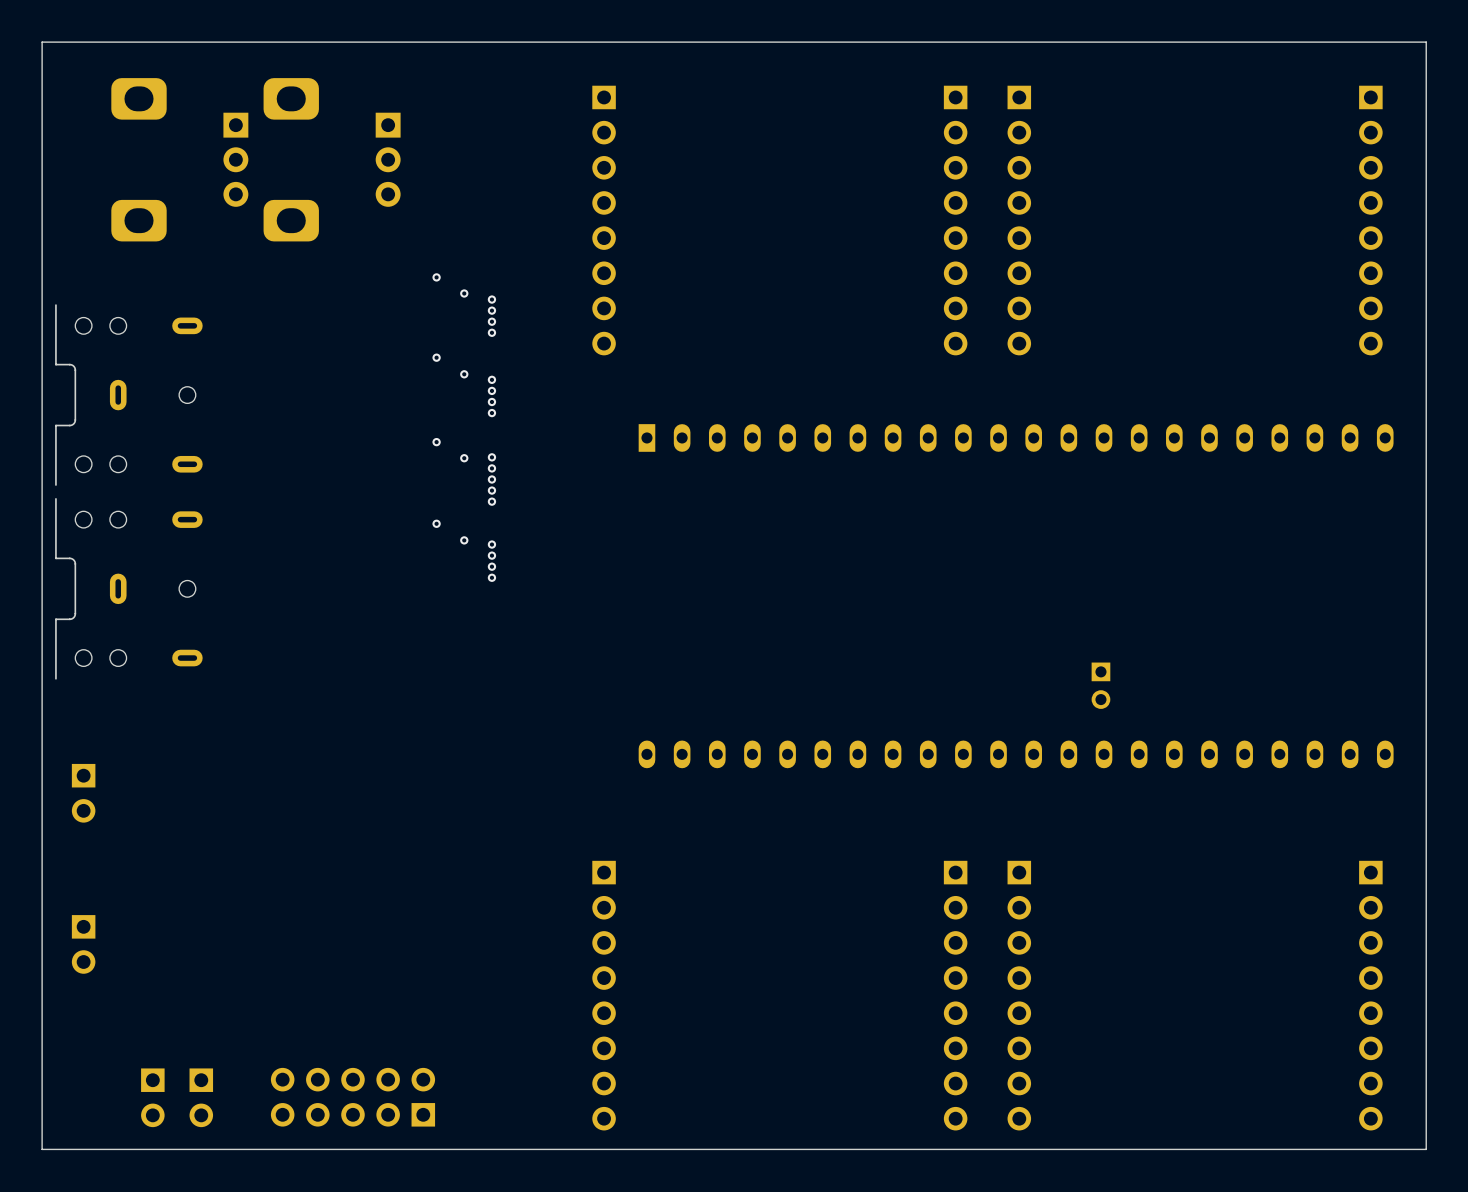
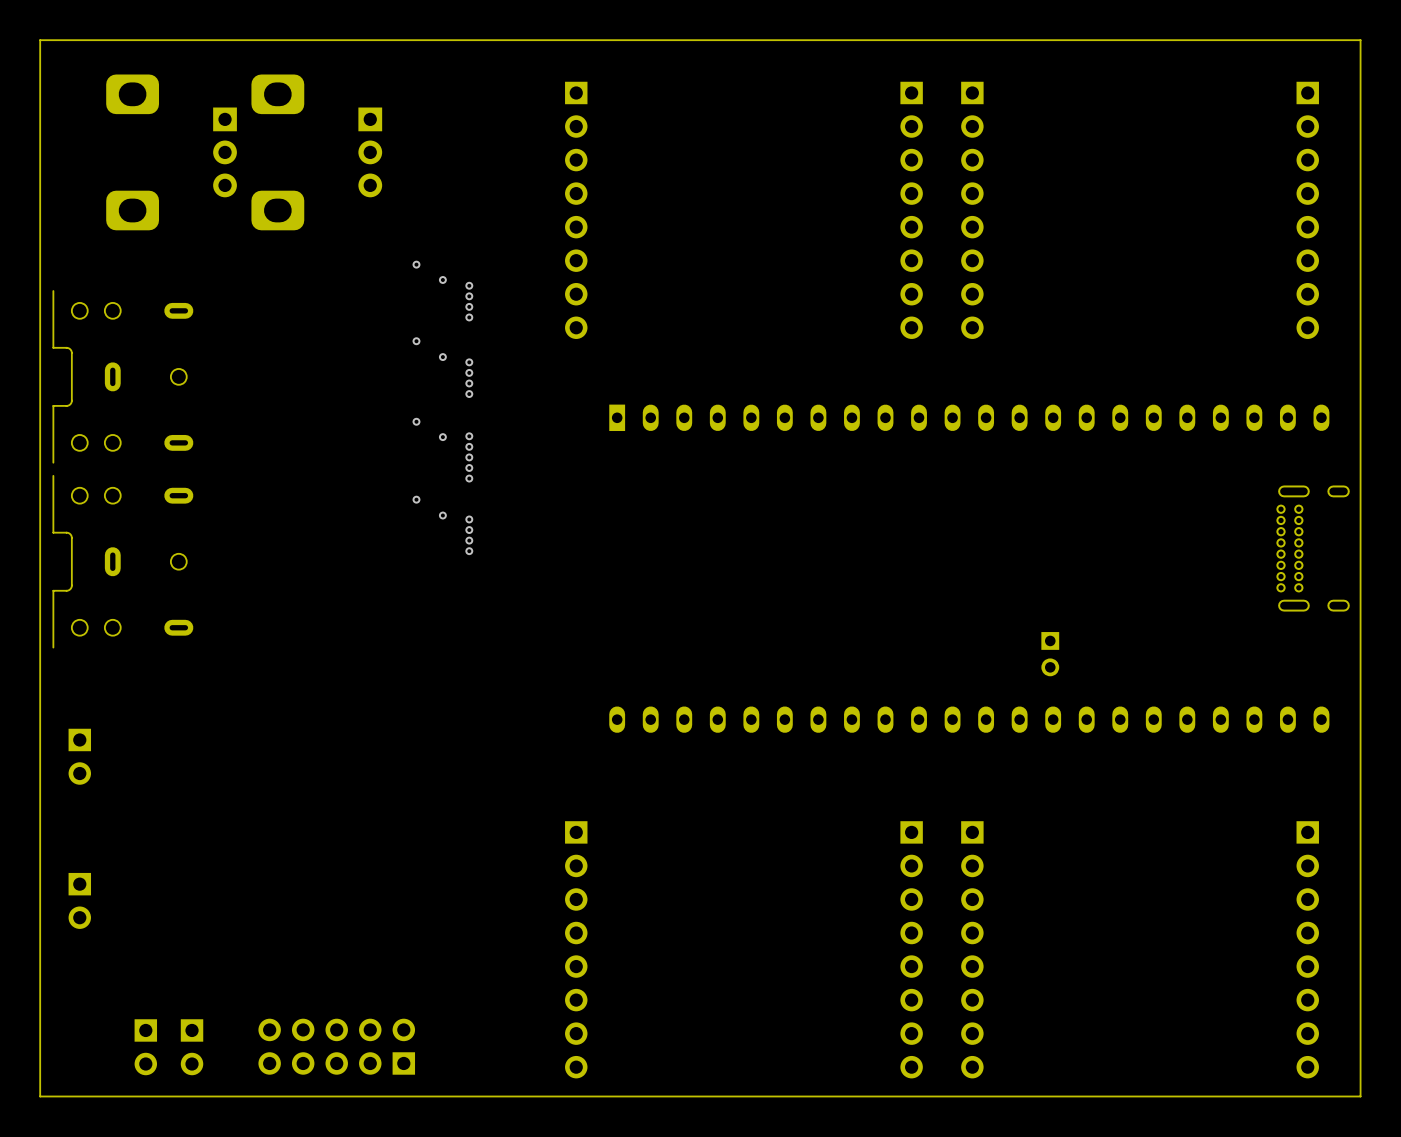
part: none -> (1313, 548)

